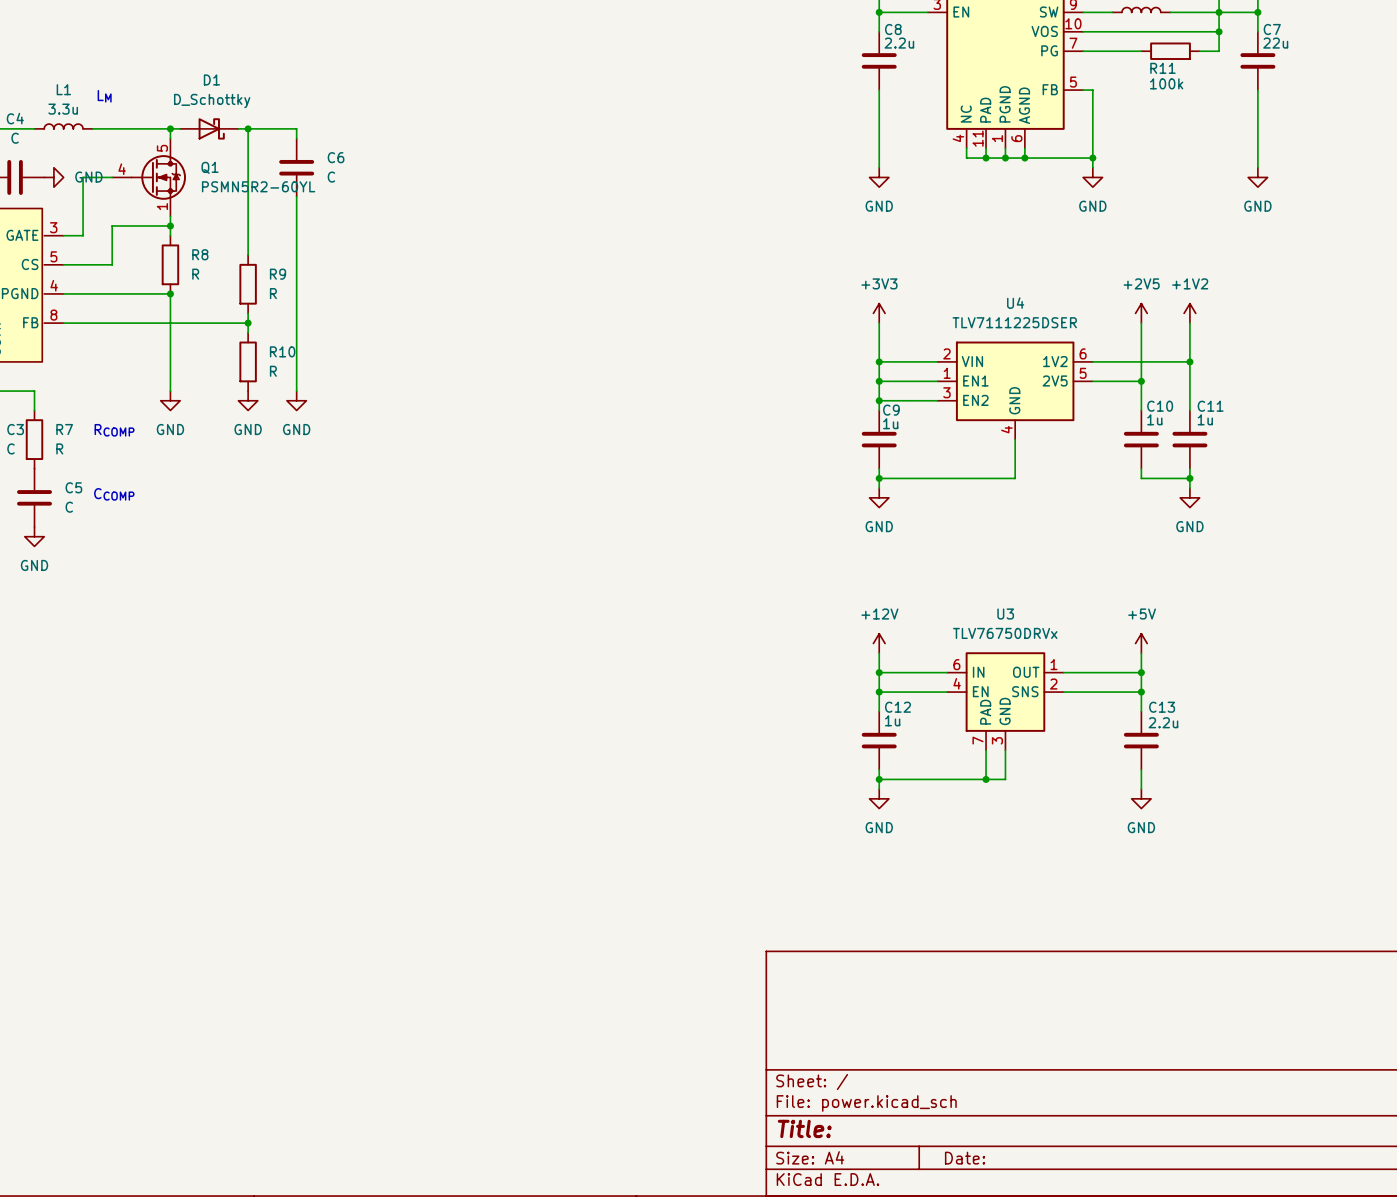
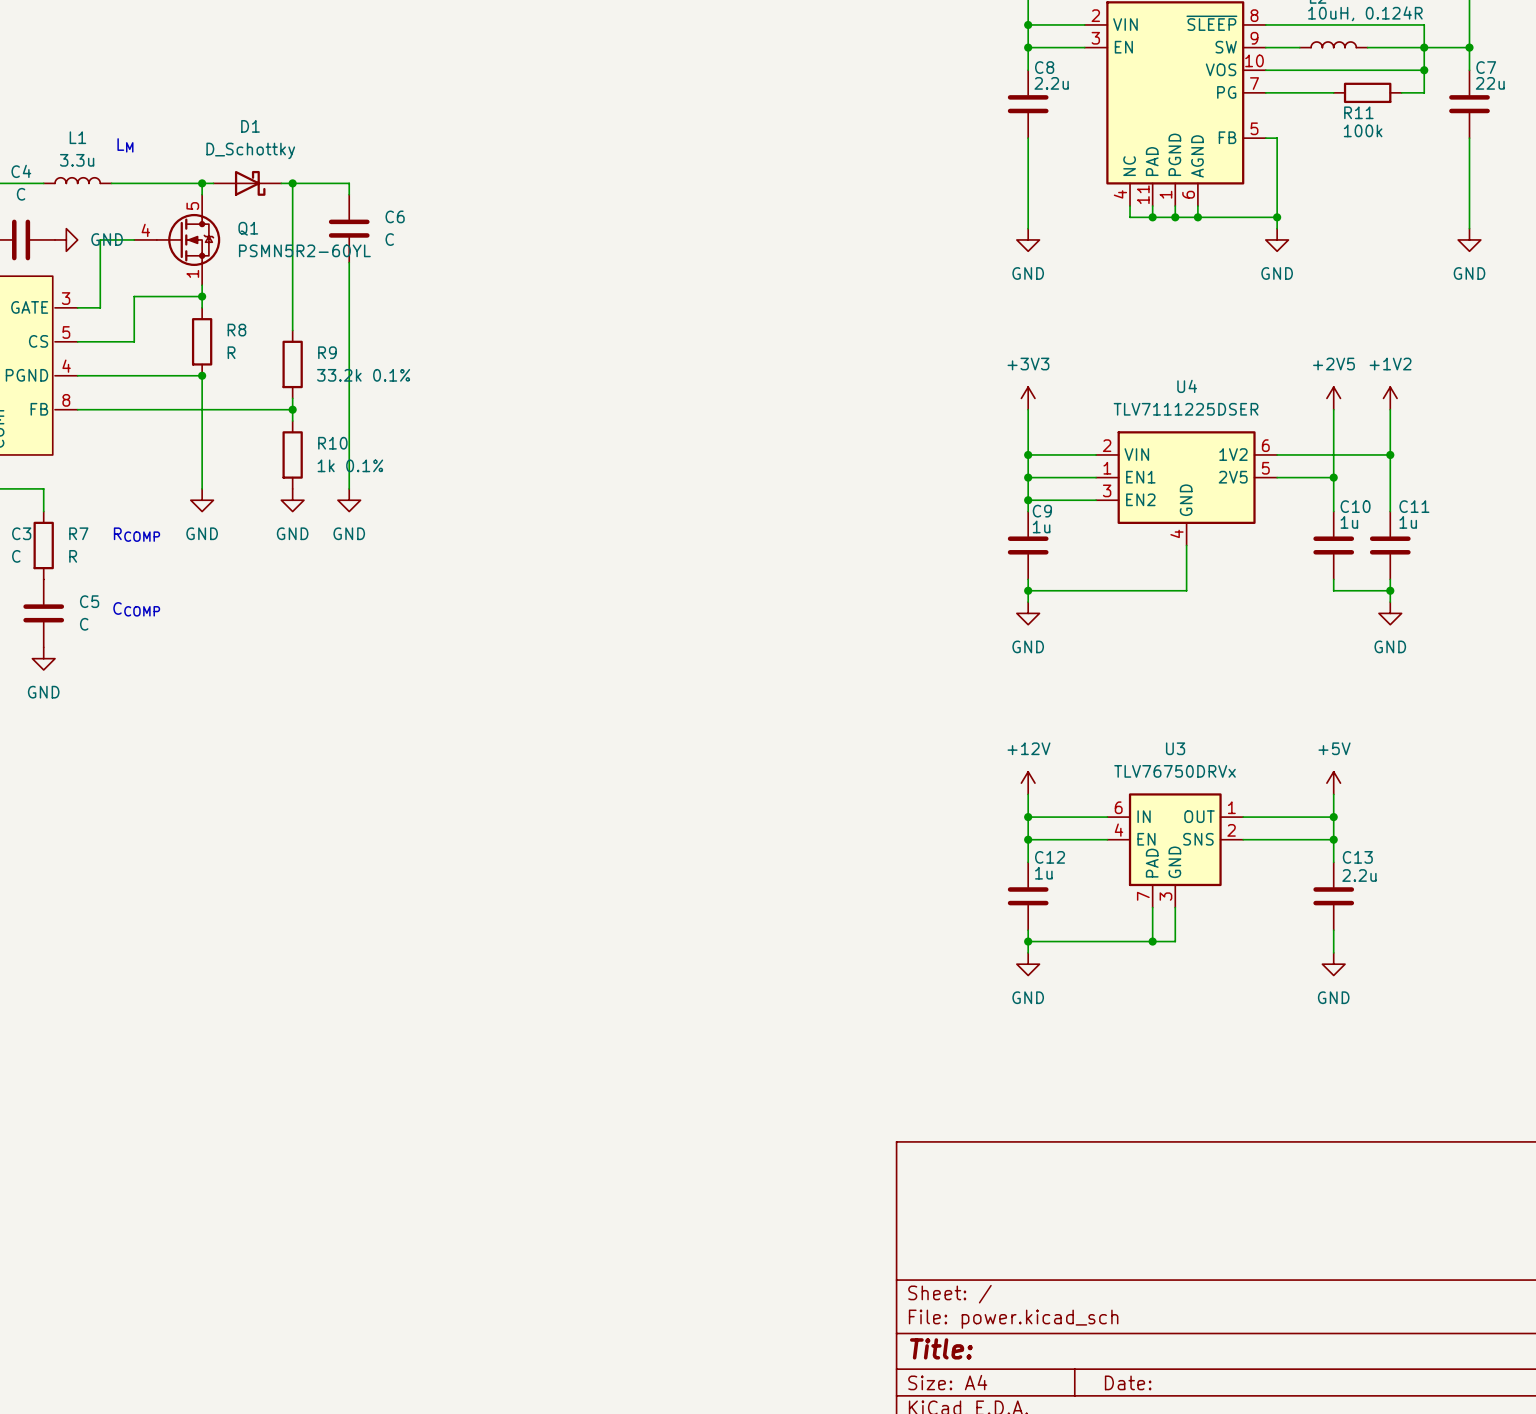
R9 value: R (273, 293) -> 33.2k 0.1% (363, 375)
R10 value: R (273, 371) -> 1k 0.1% (350, 465)

